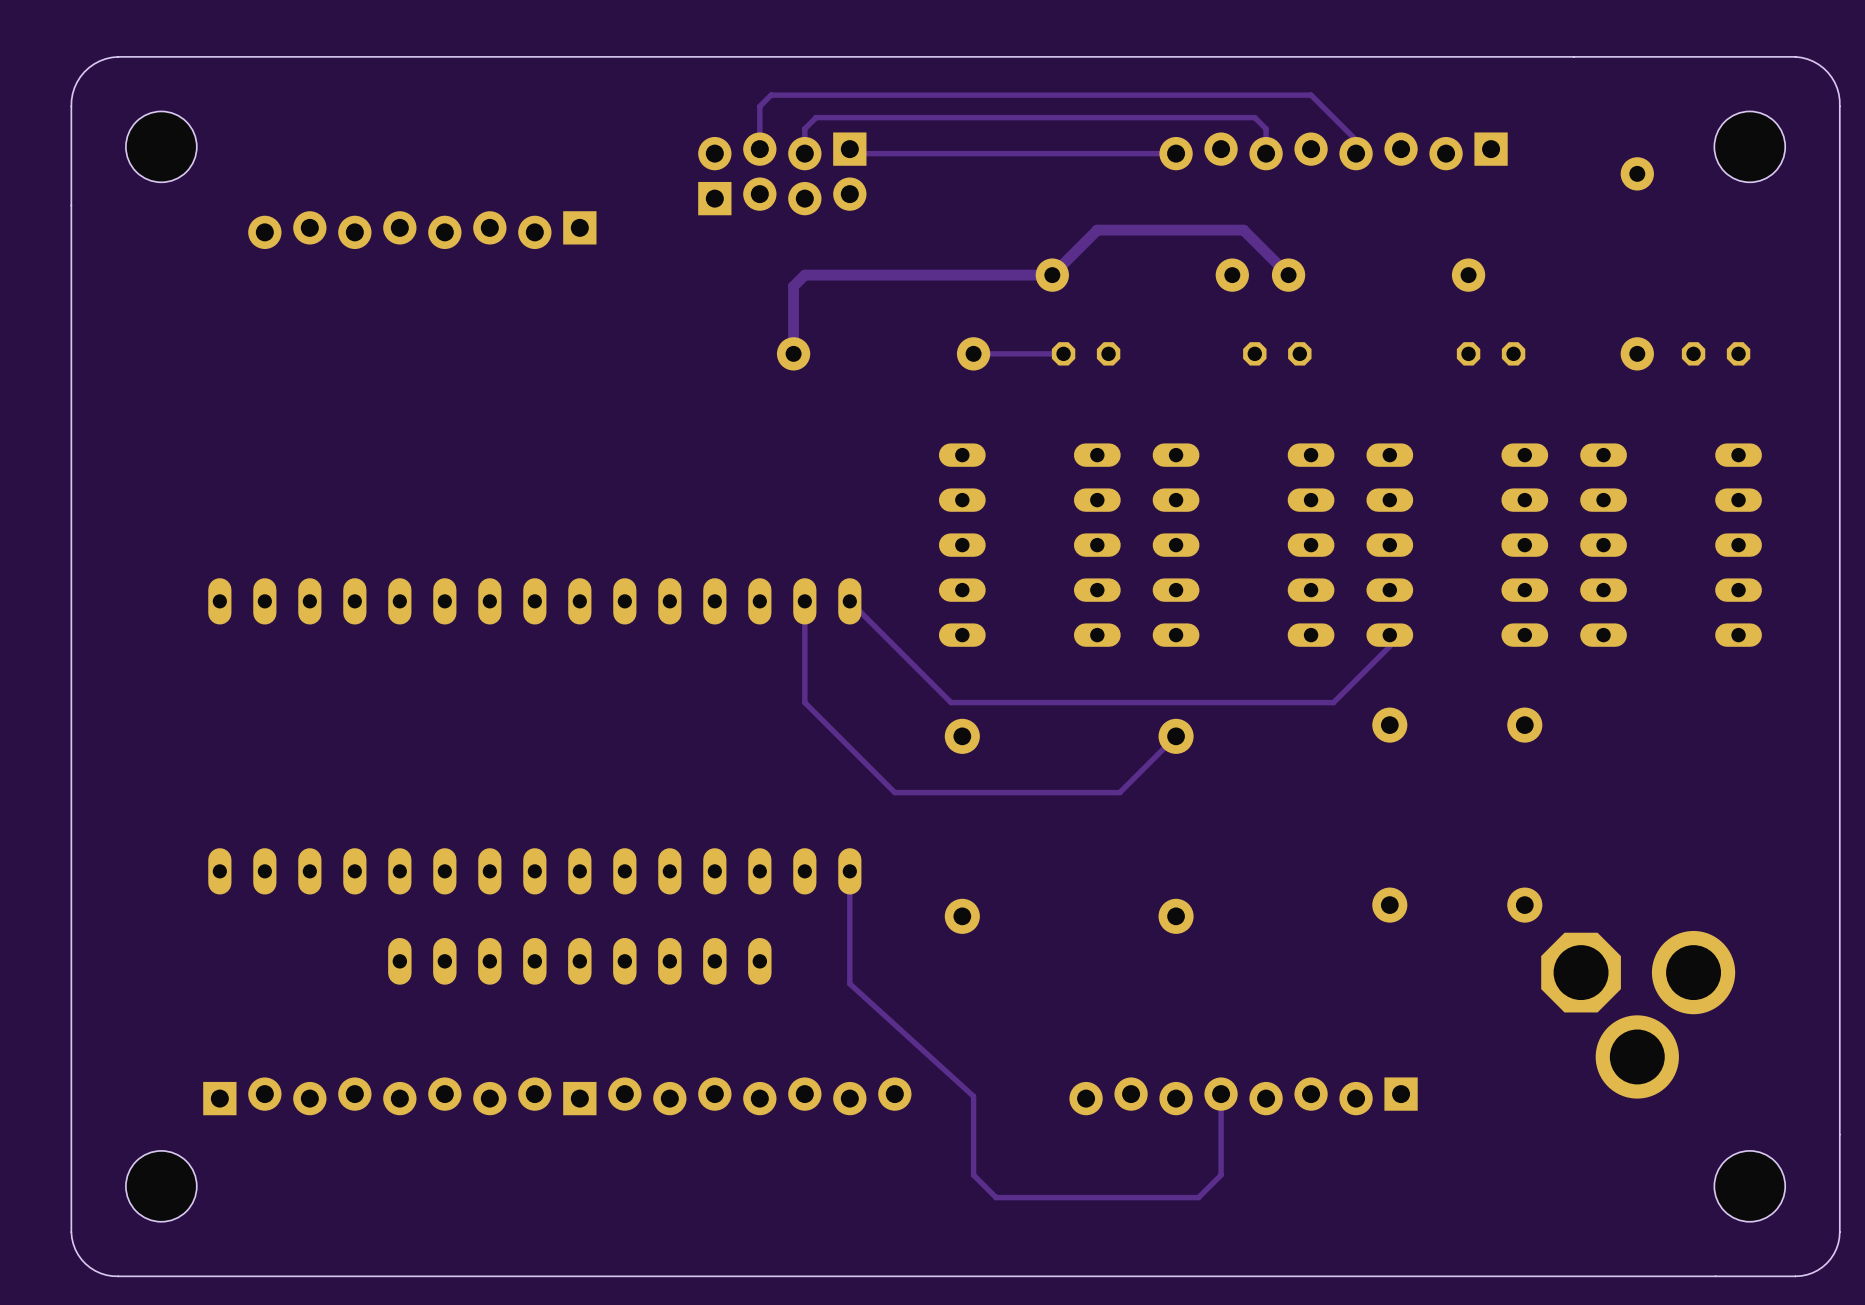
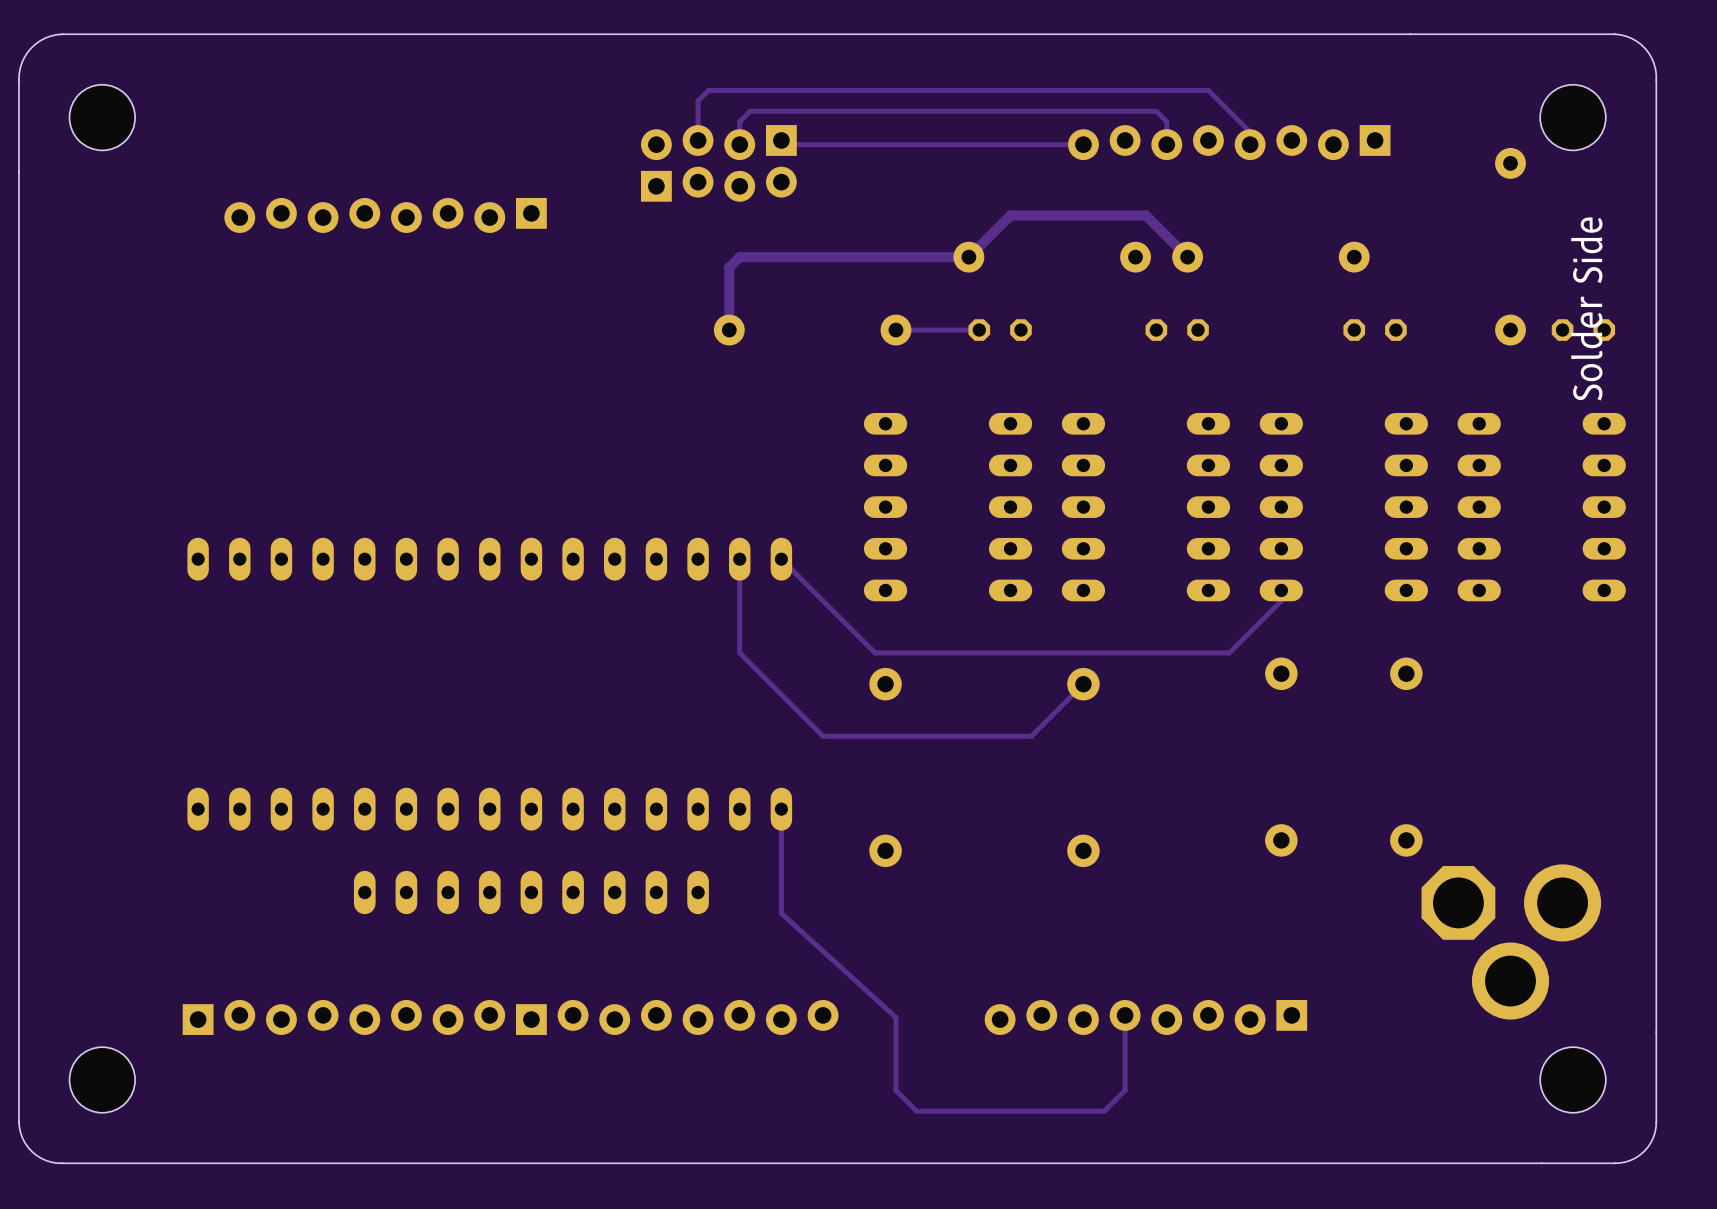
text: none -> Solder Side (1586, 308)
part position: (955, 666) -> (837, 598)

